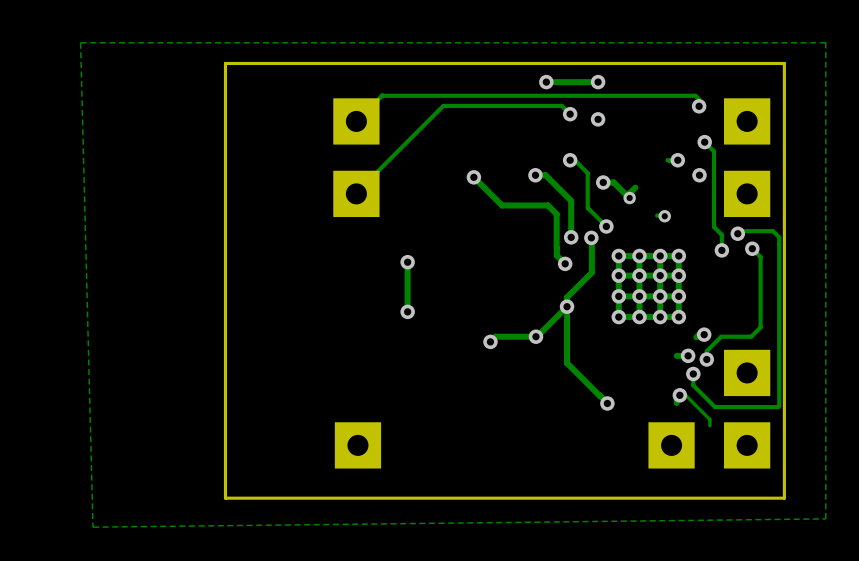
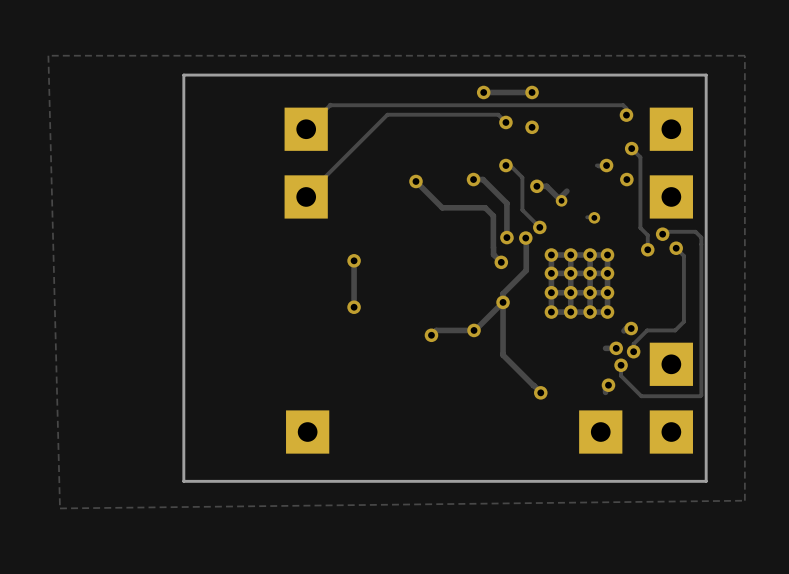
track: (679, 395) (685, 395) (709, 419) (709, 425) -> none

